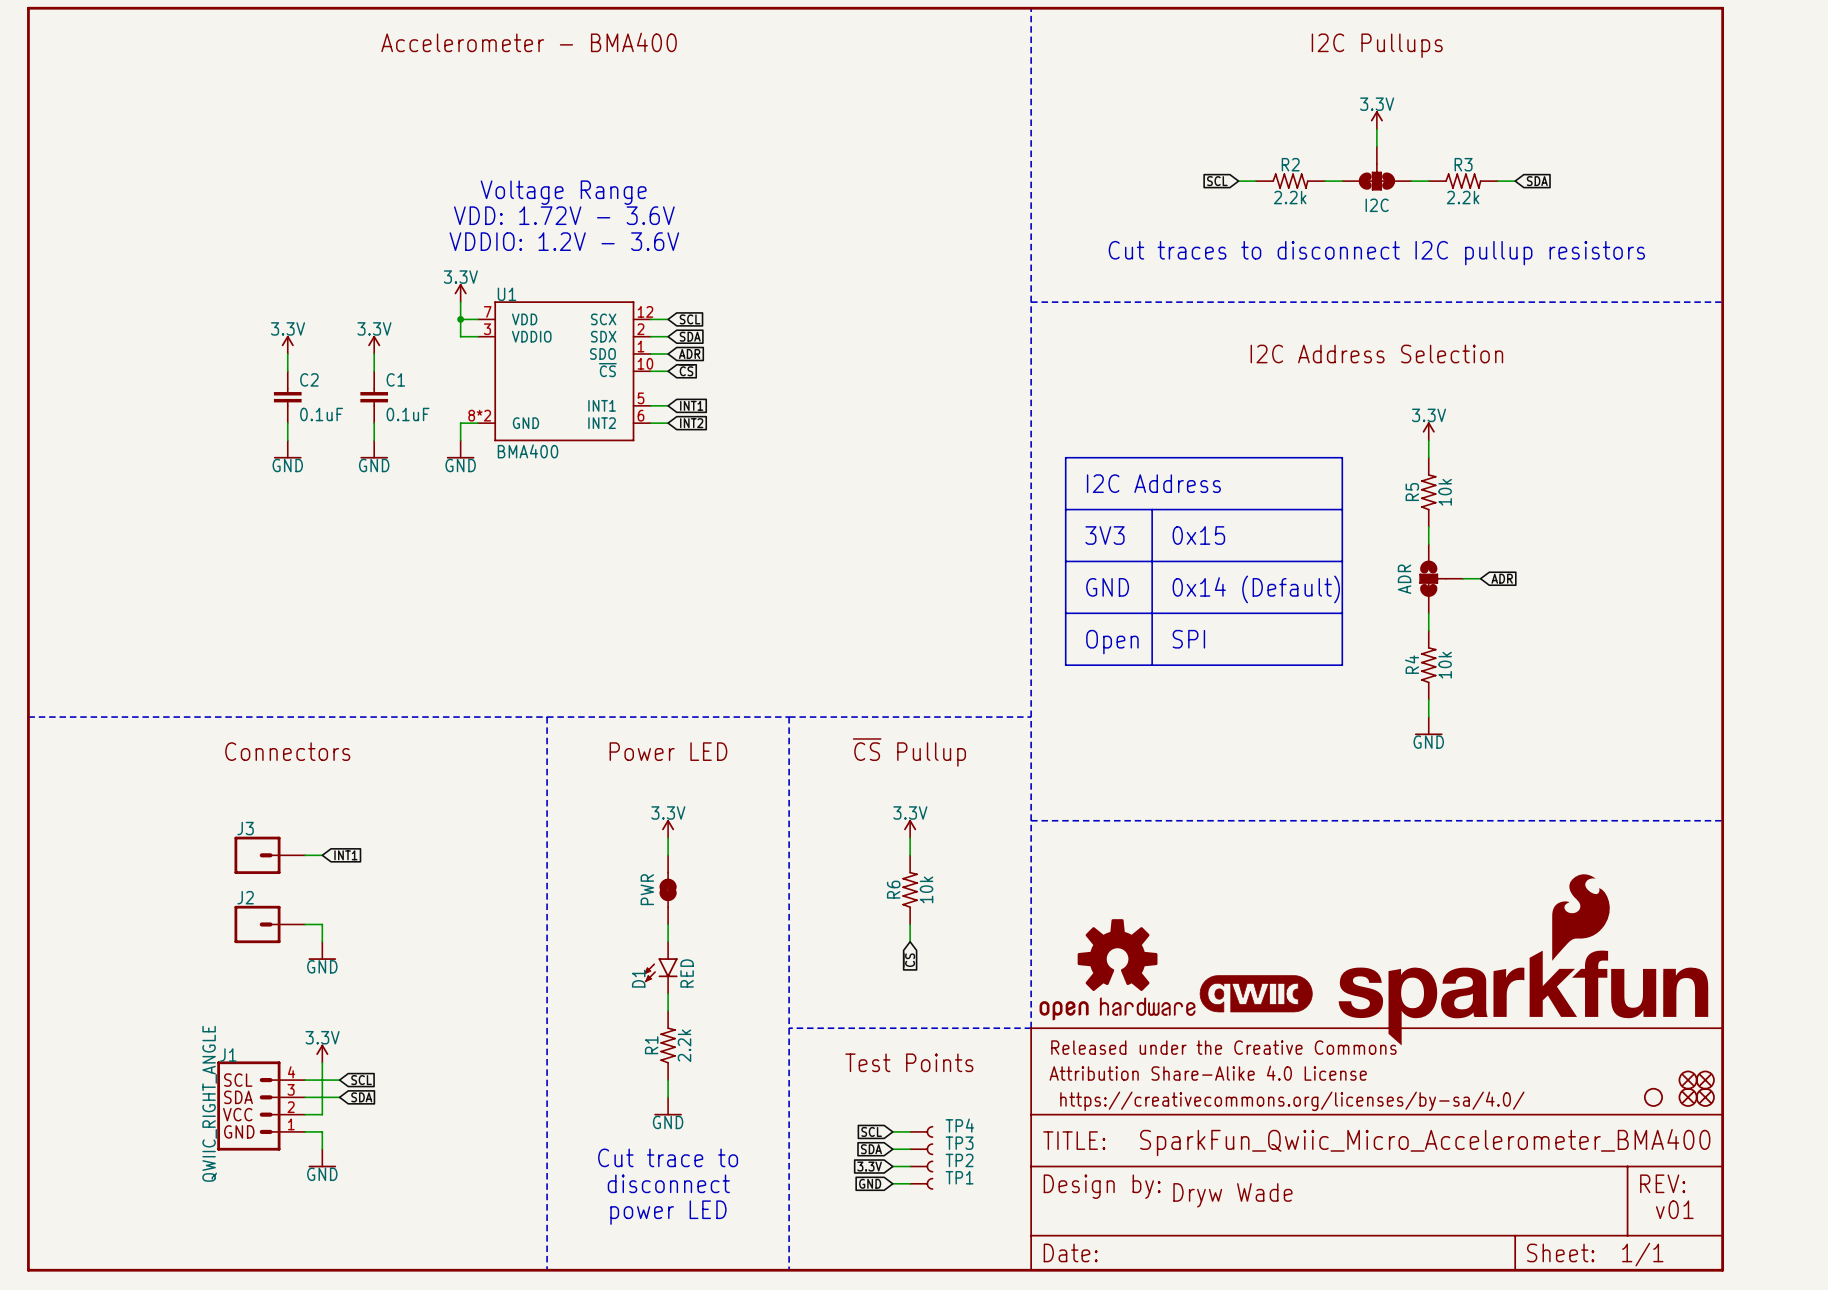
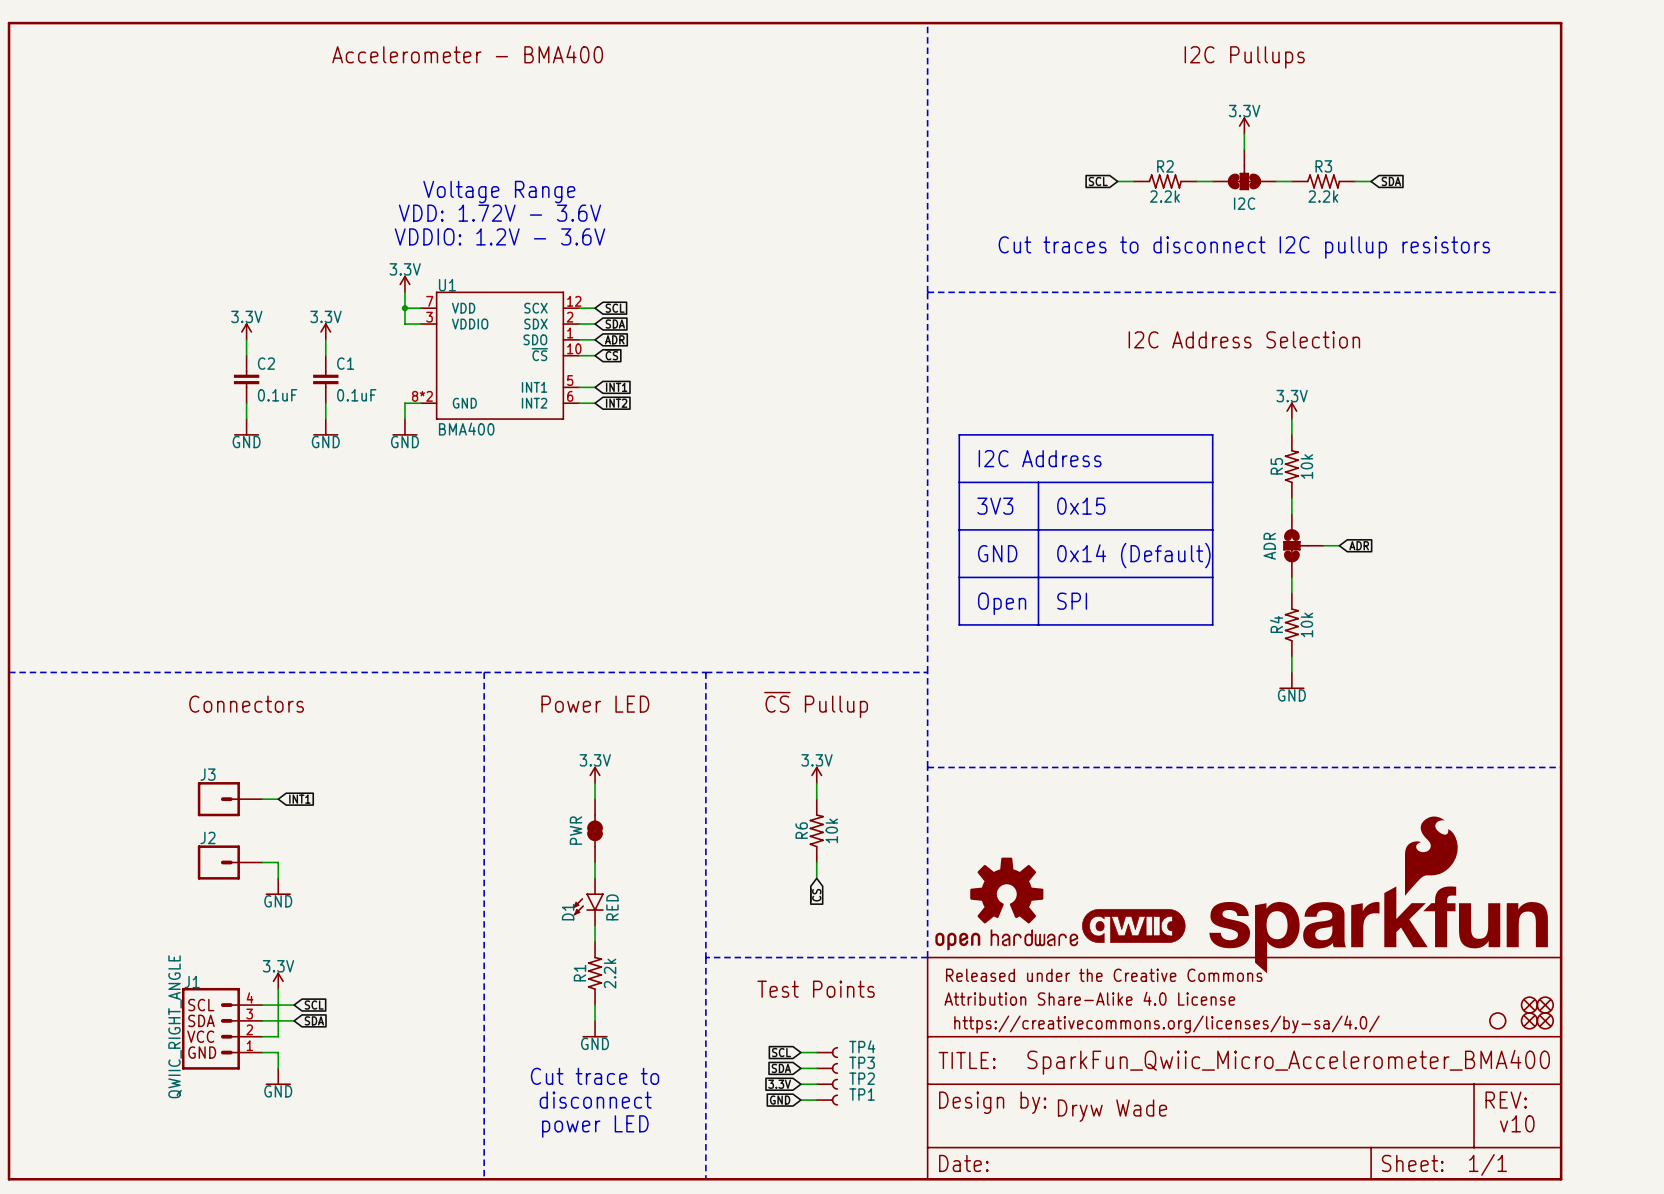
text: v01 (1674, 1209) -> v10 (1517, 1123)

